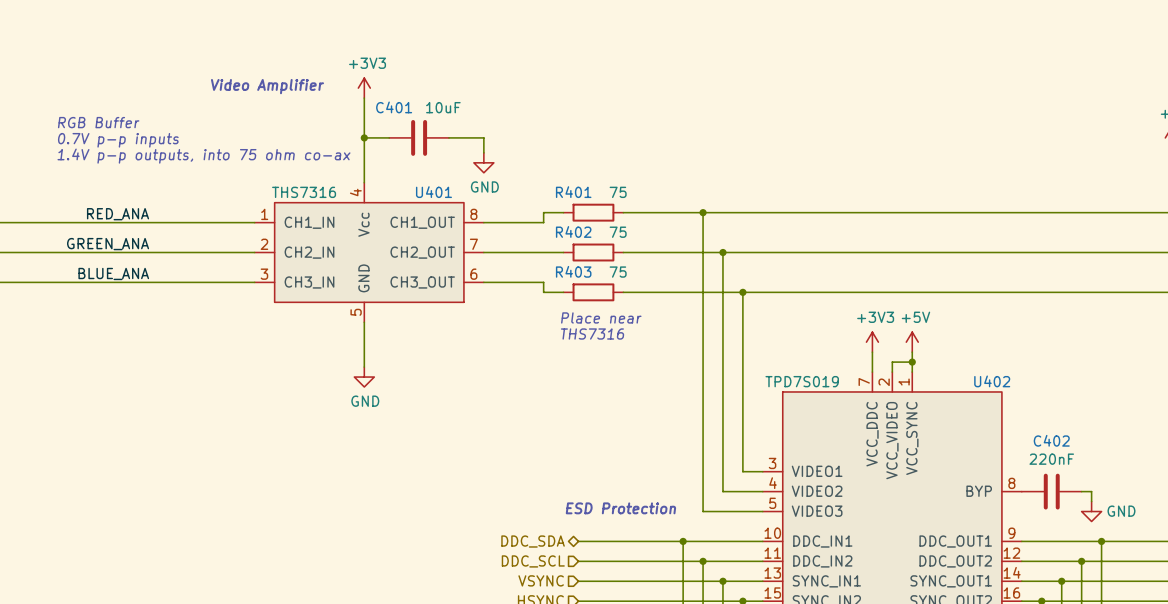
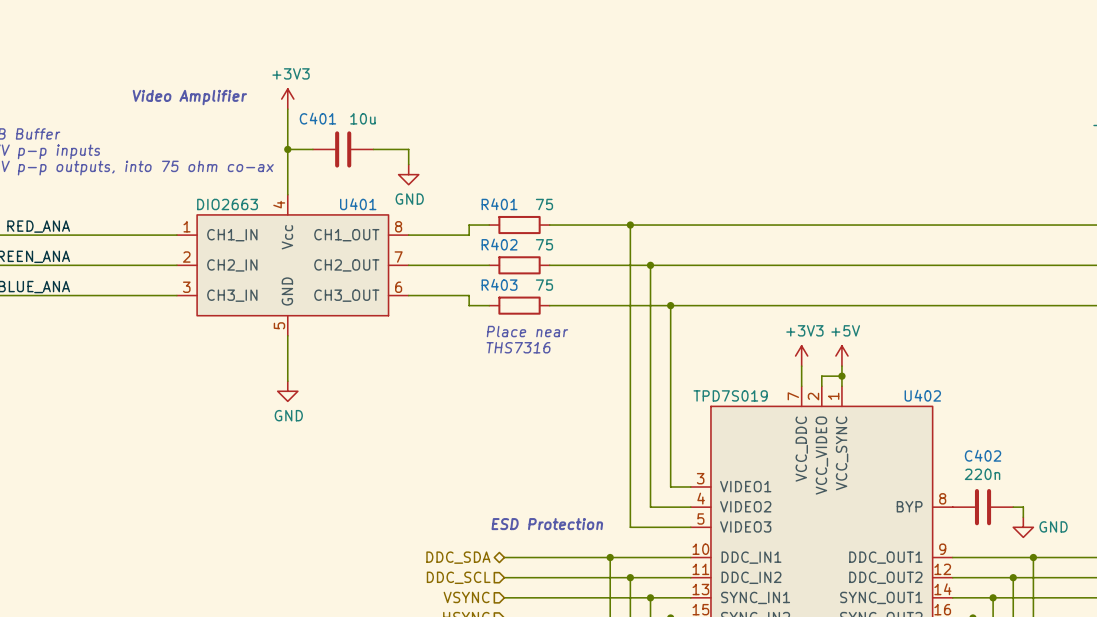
C401 value: 10uF (443, 107) -> 10u (362, 118)
U401 value: THS7316 (304, 192) -> DIO2663 (227, 204)
C402 value: 220nF (1051, 459) -> 220n (982, 474)

